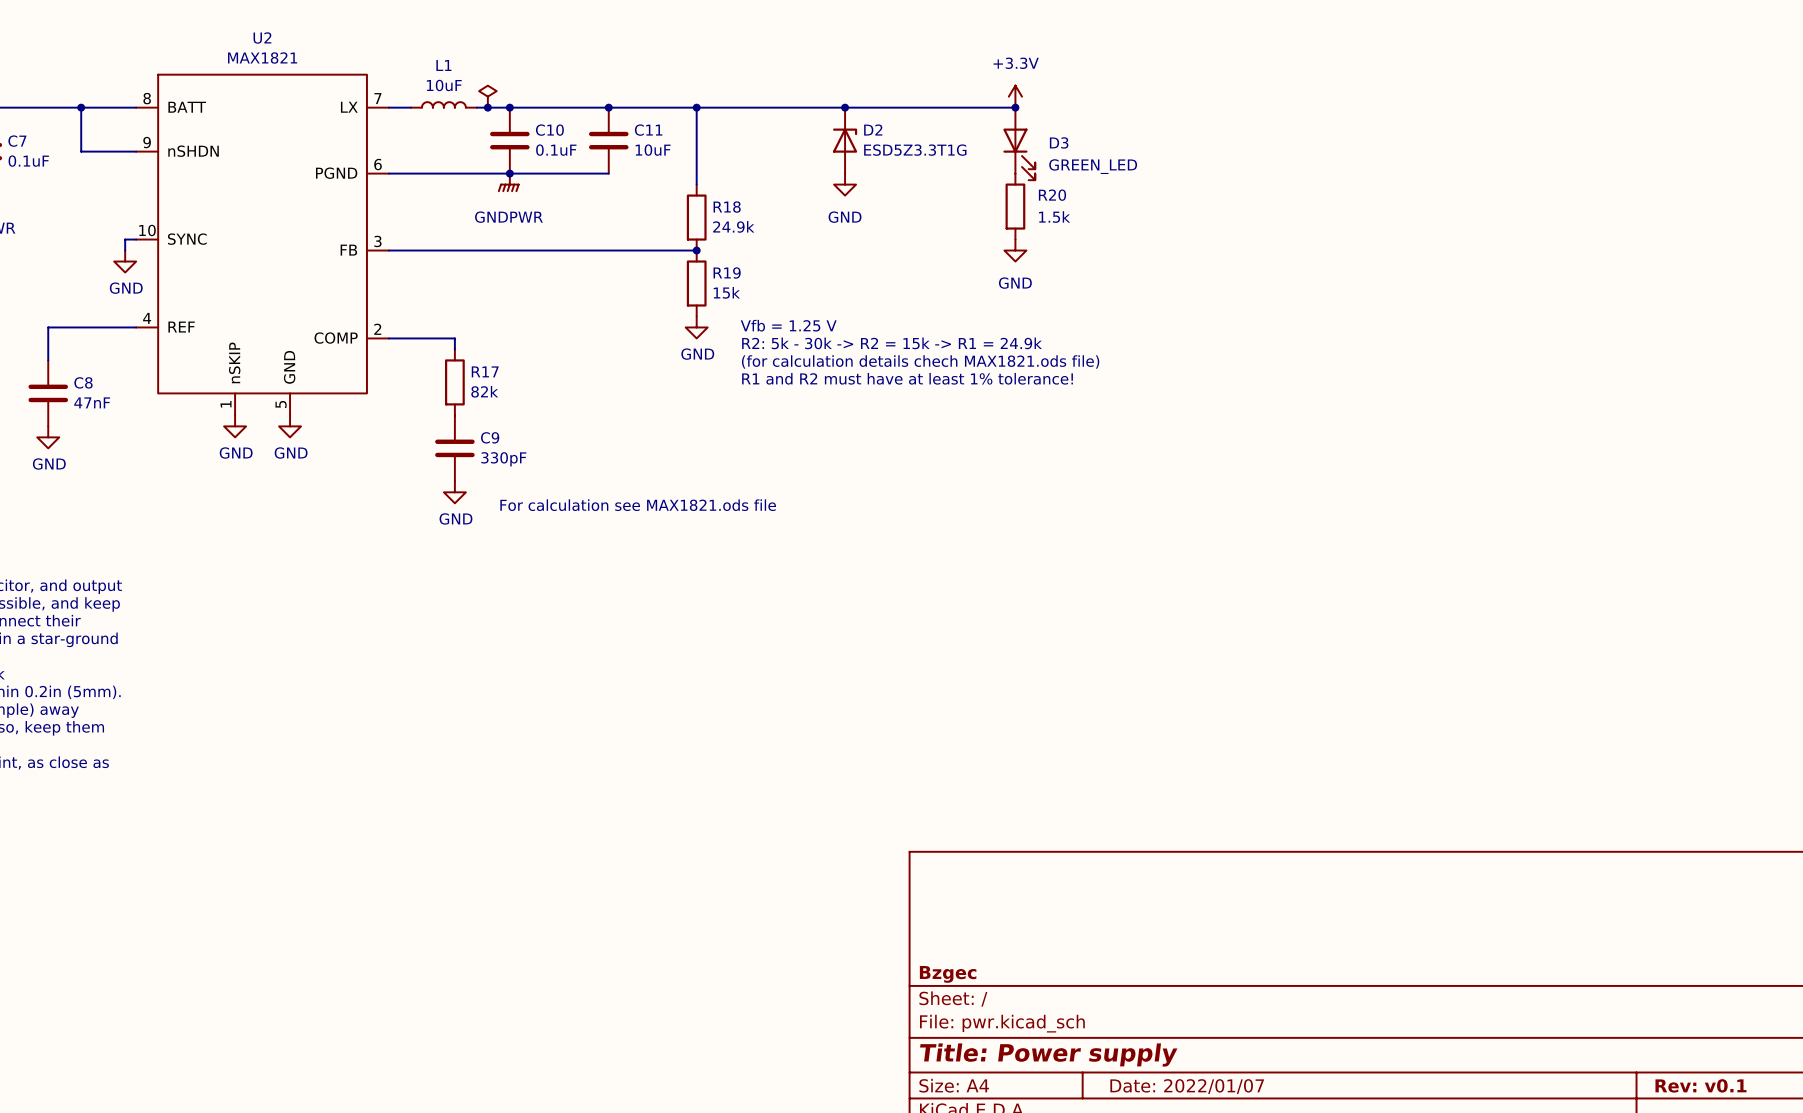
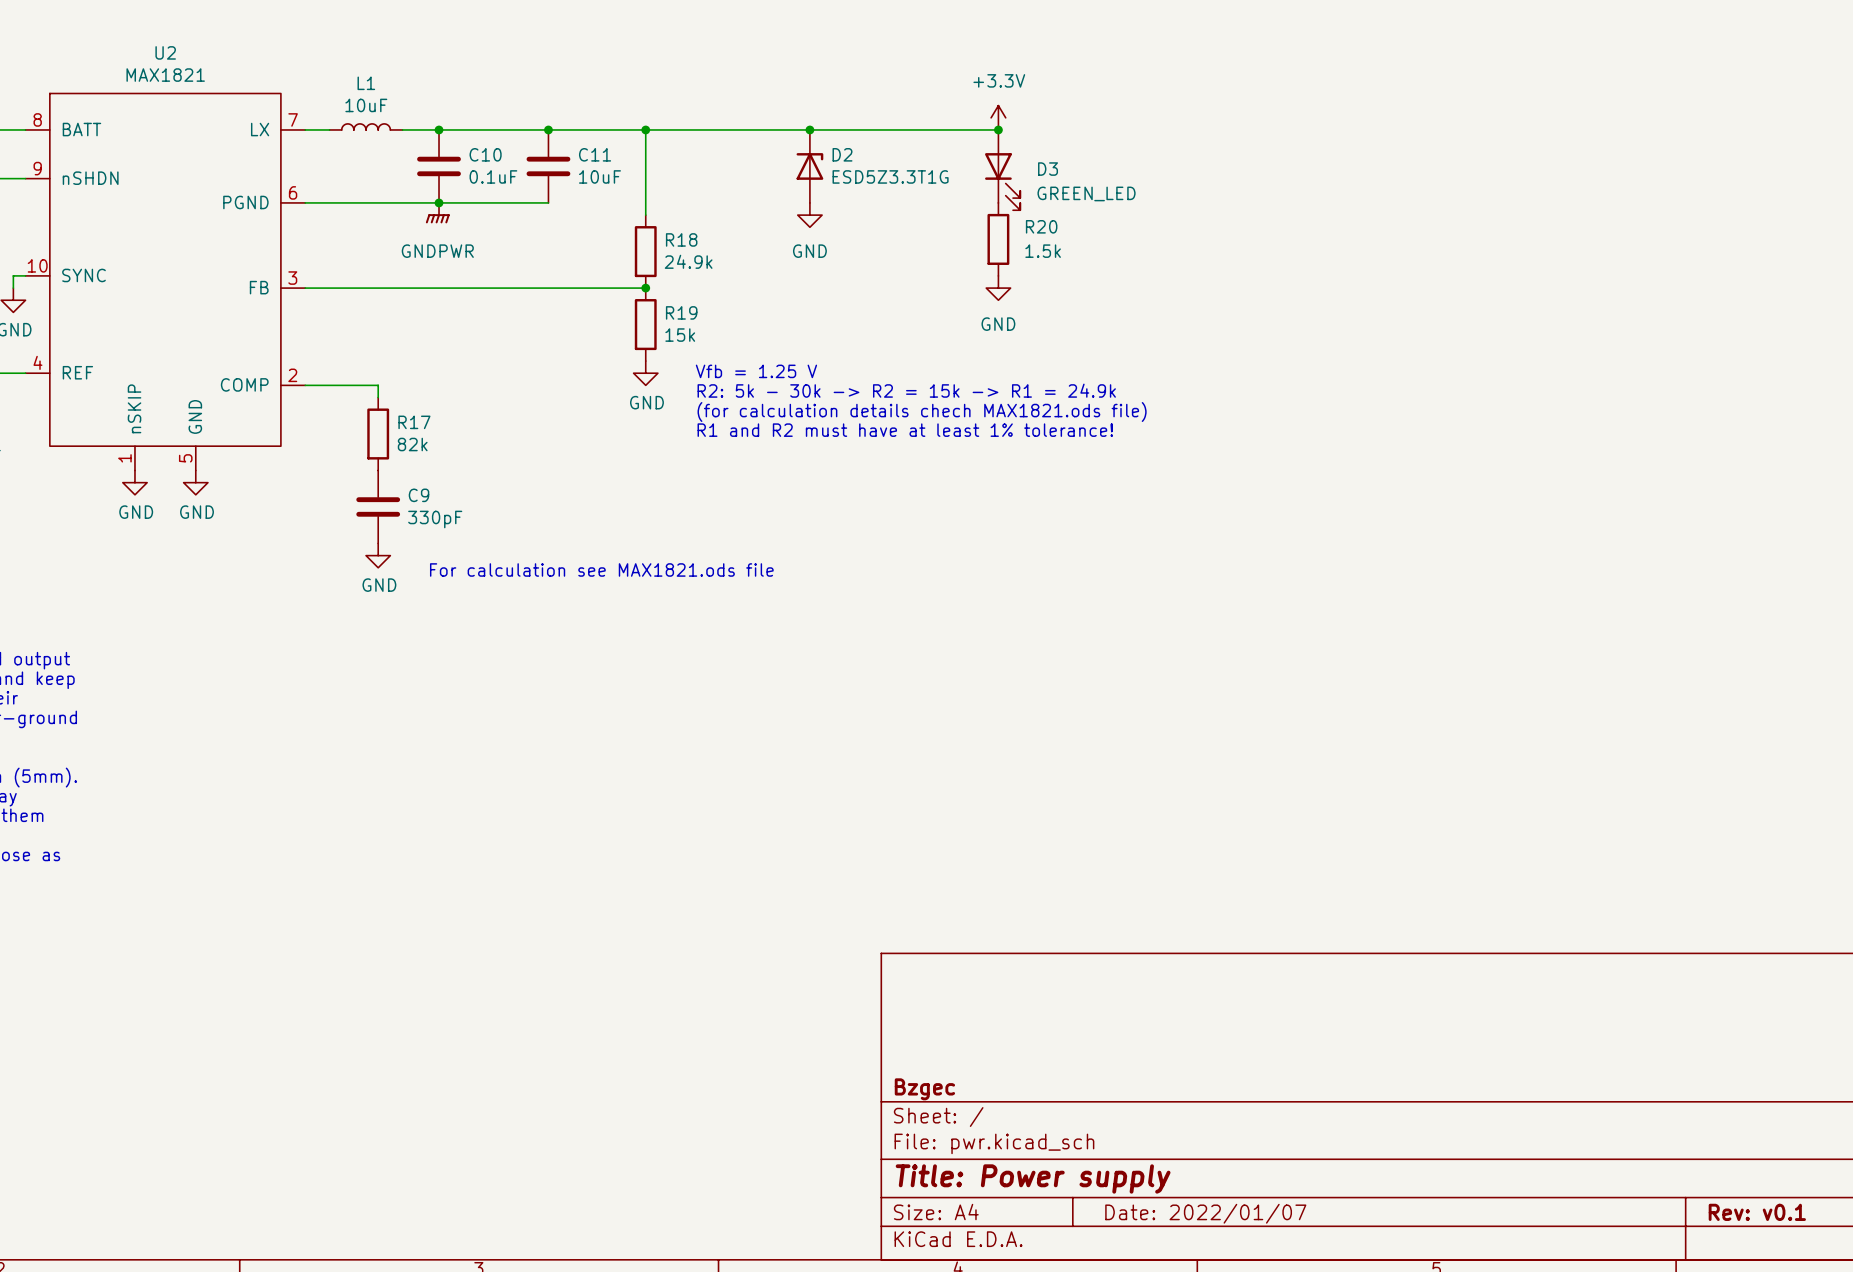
power symbol: (487, 96) -> none
junction: (487, 107) -> none

